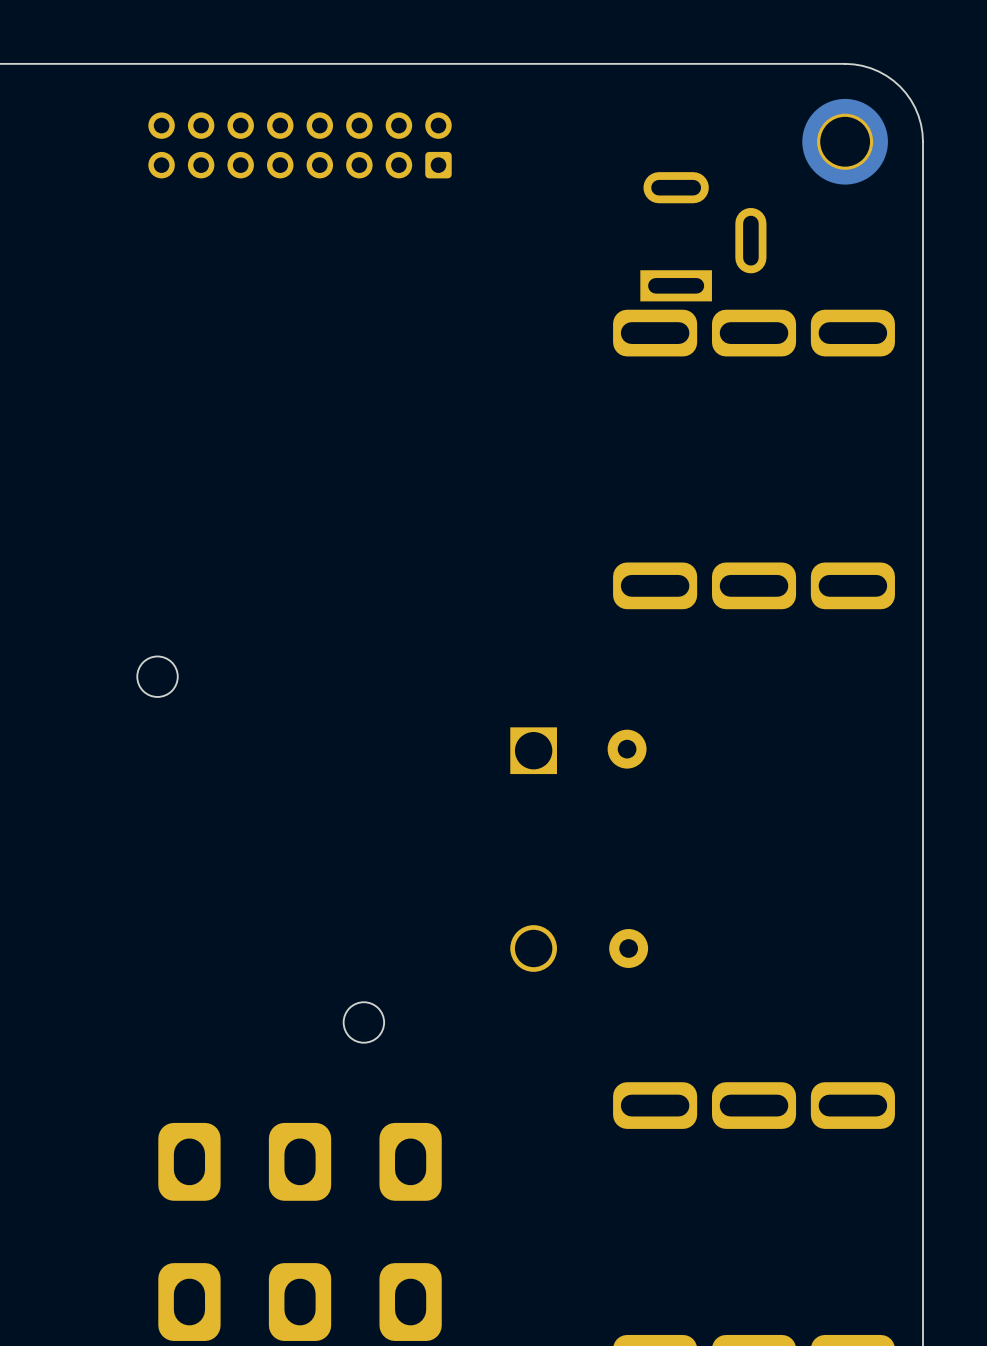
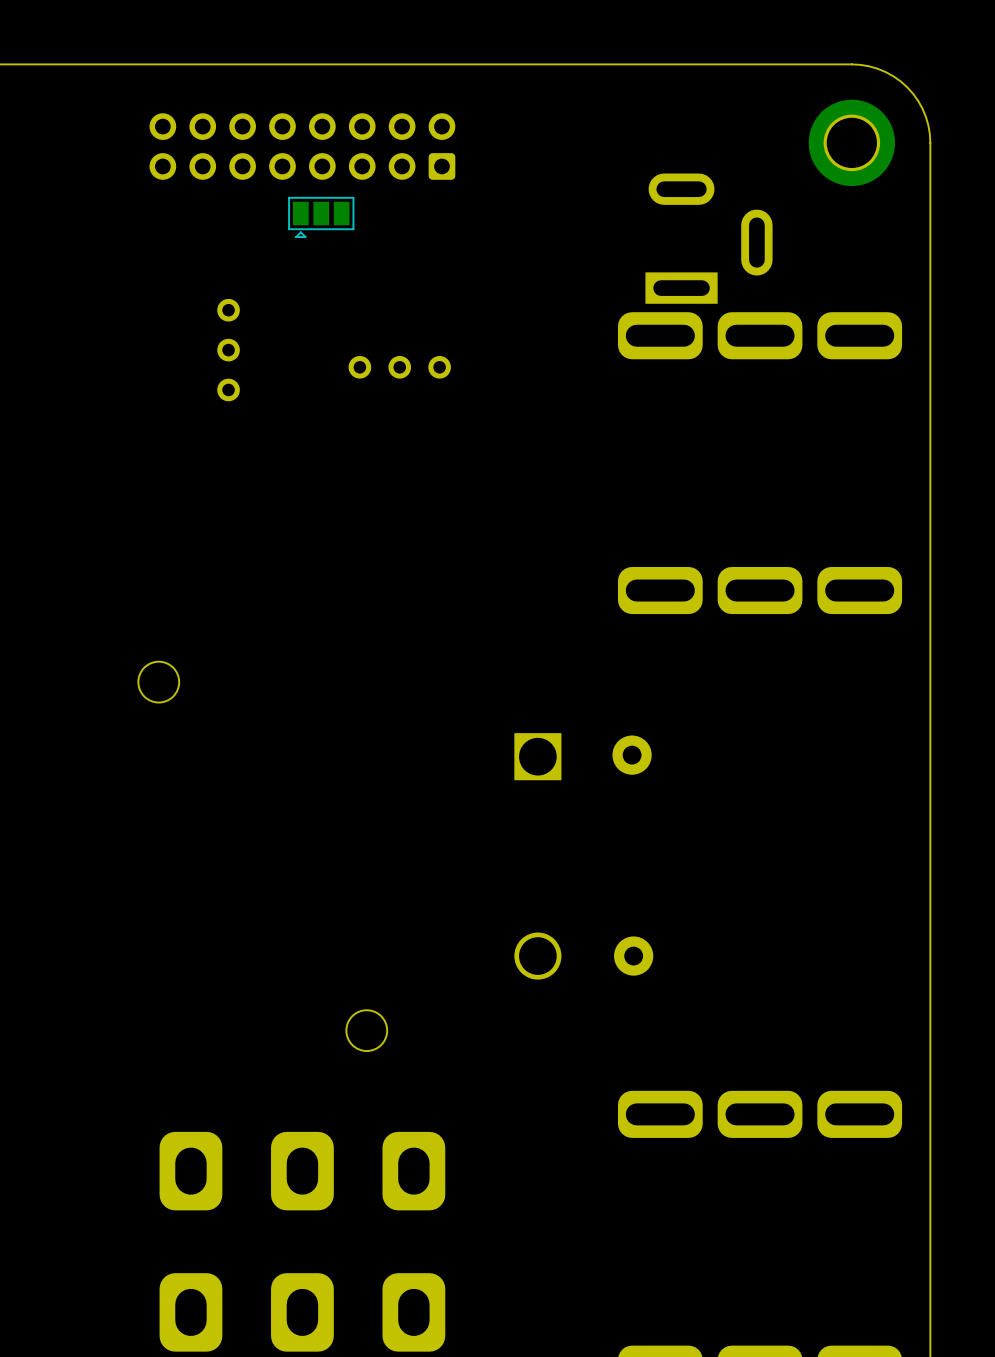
part: none -> (321, 217)
part: none -> (228, 350)
part: none -> (399, 367)

